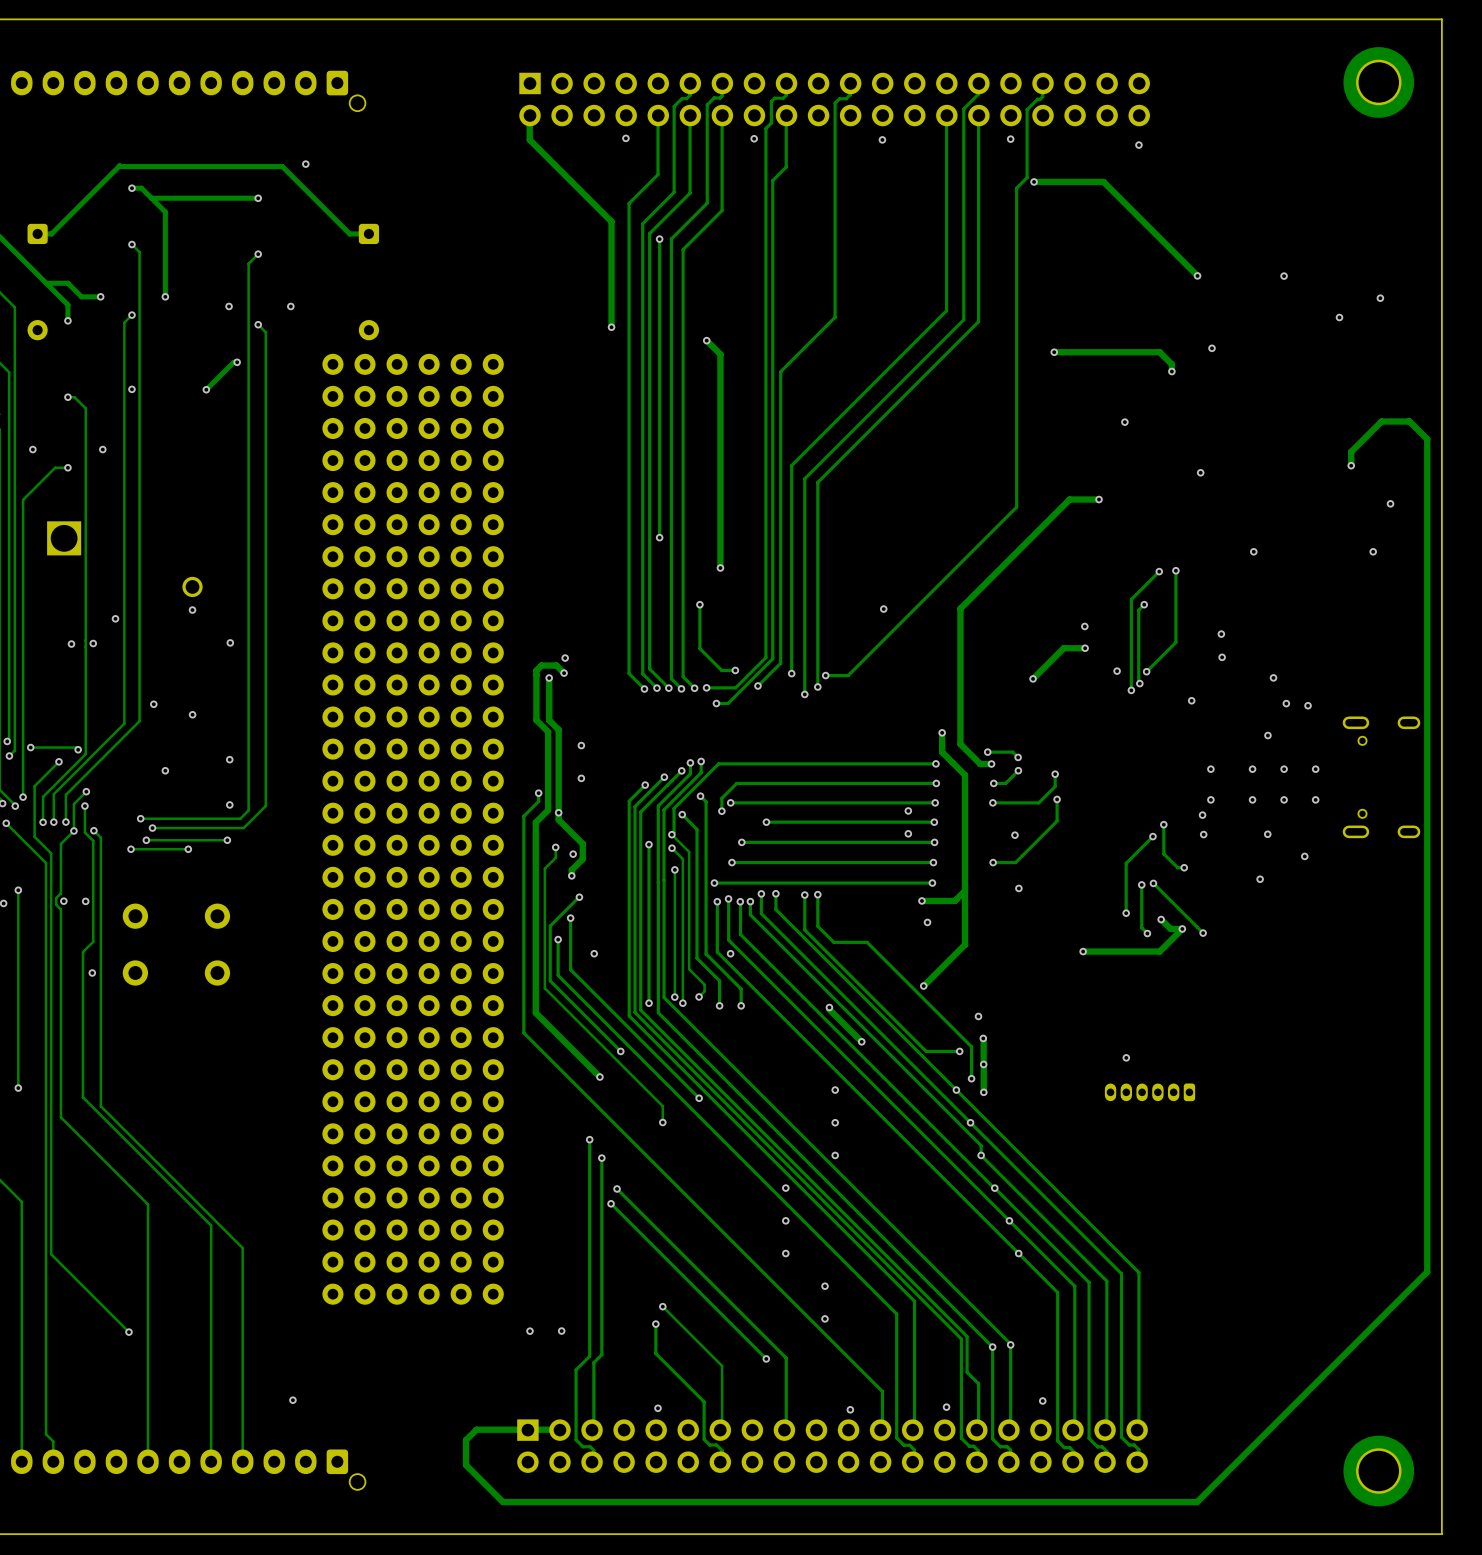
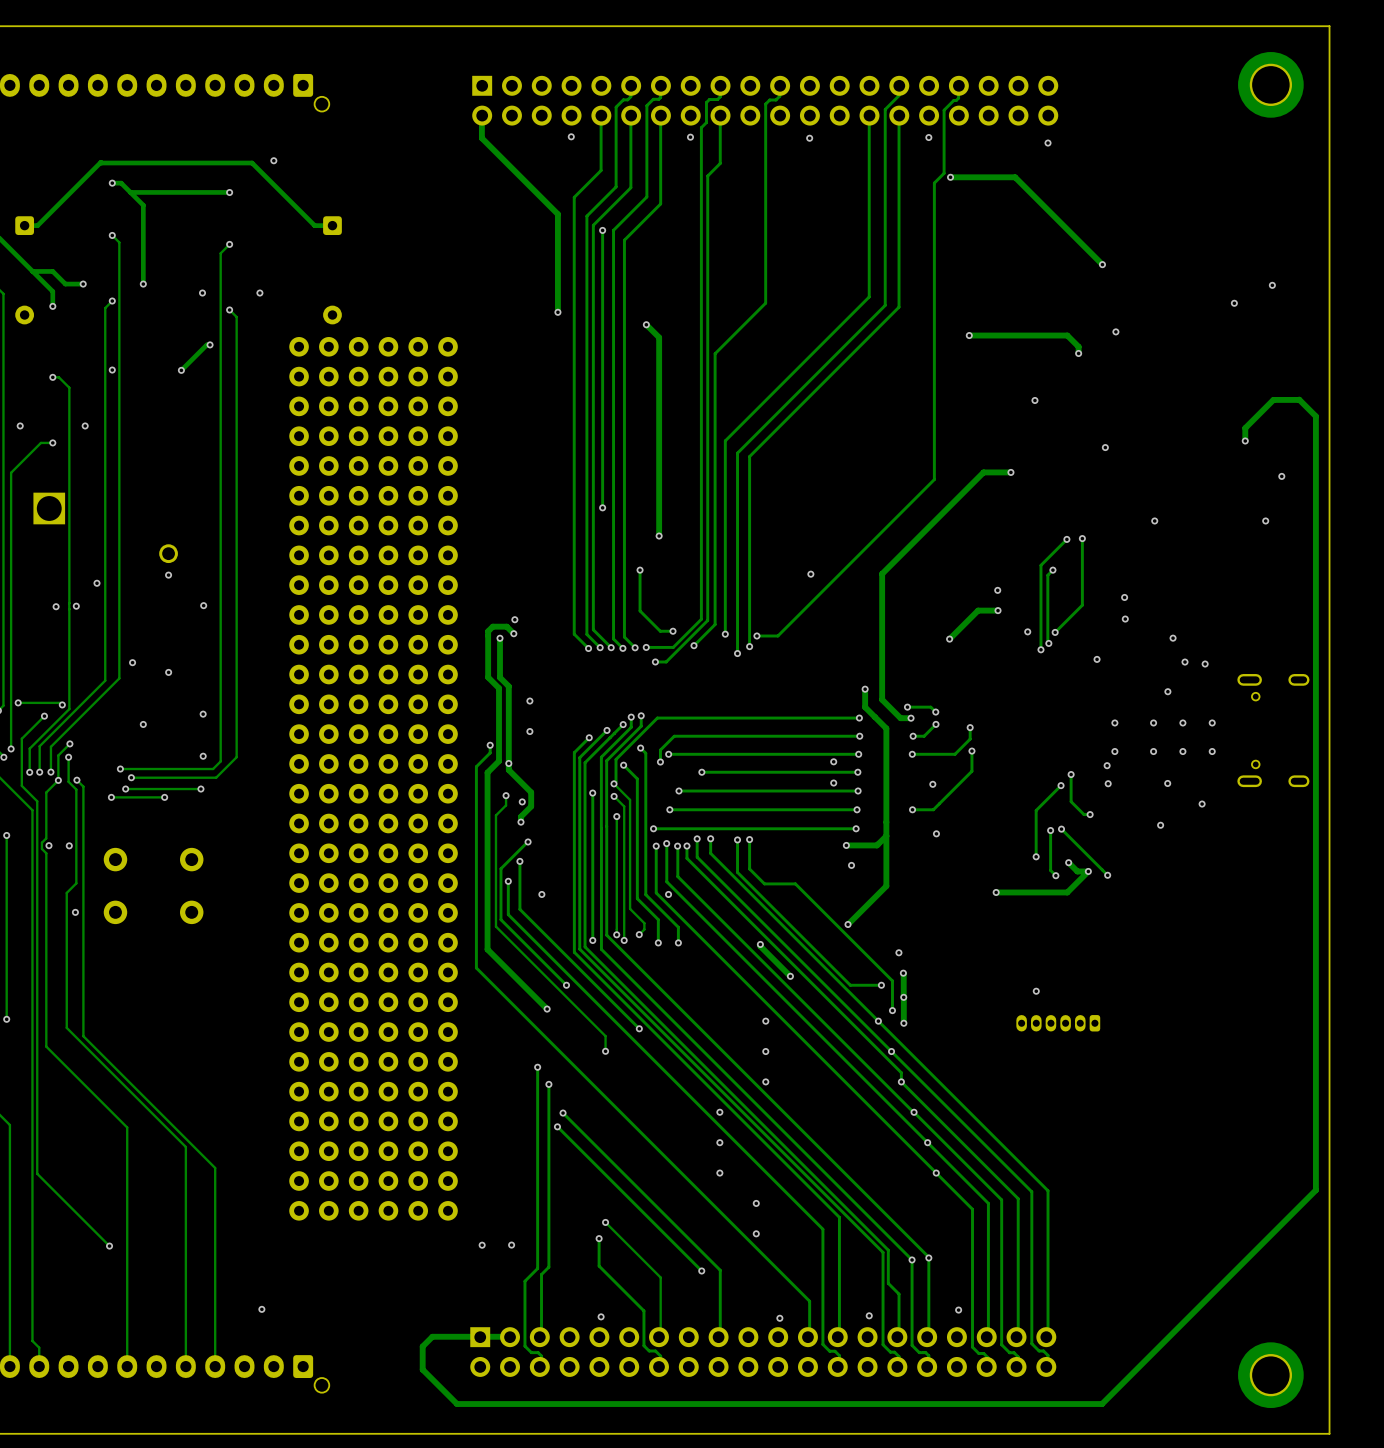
via: (1284, 276) -> none

